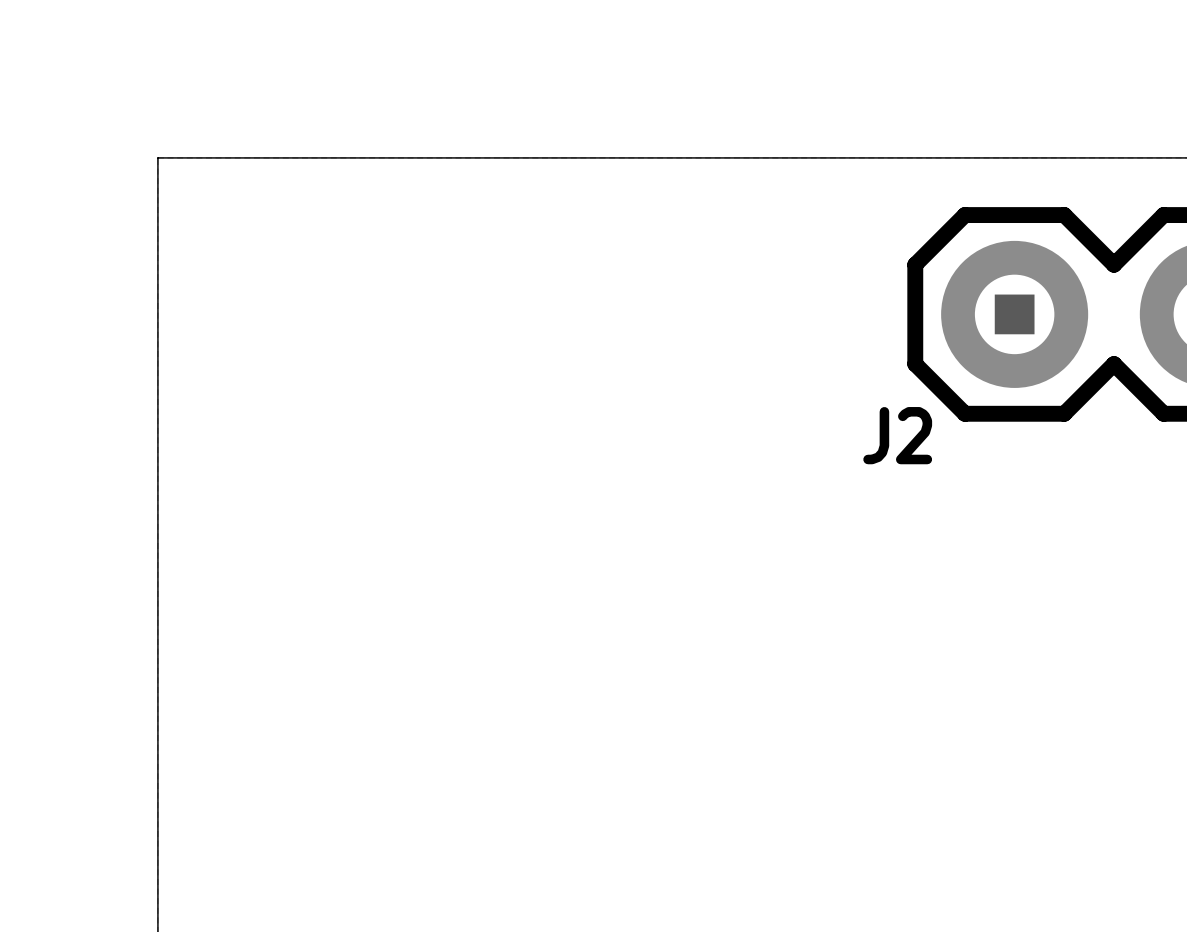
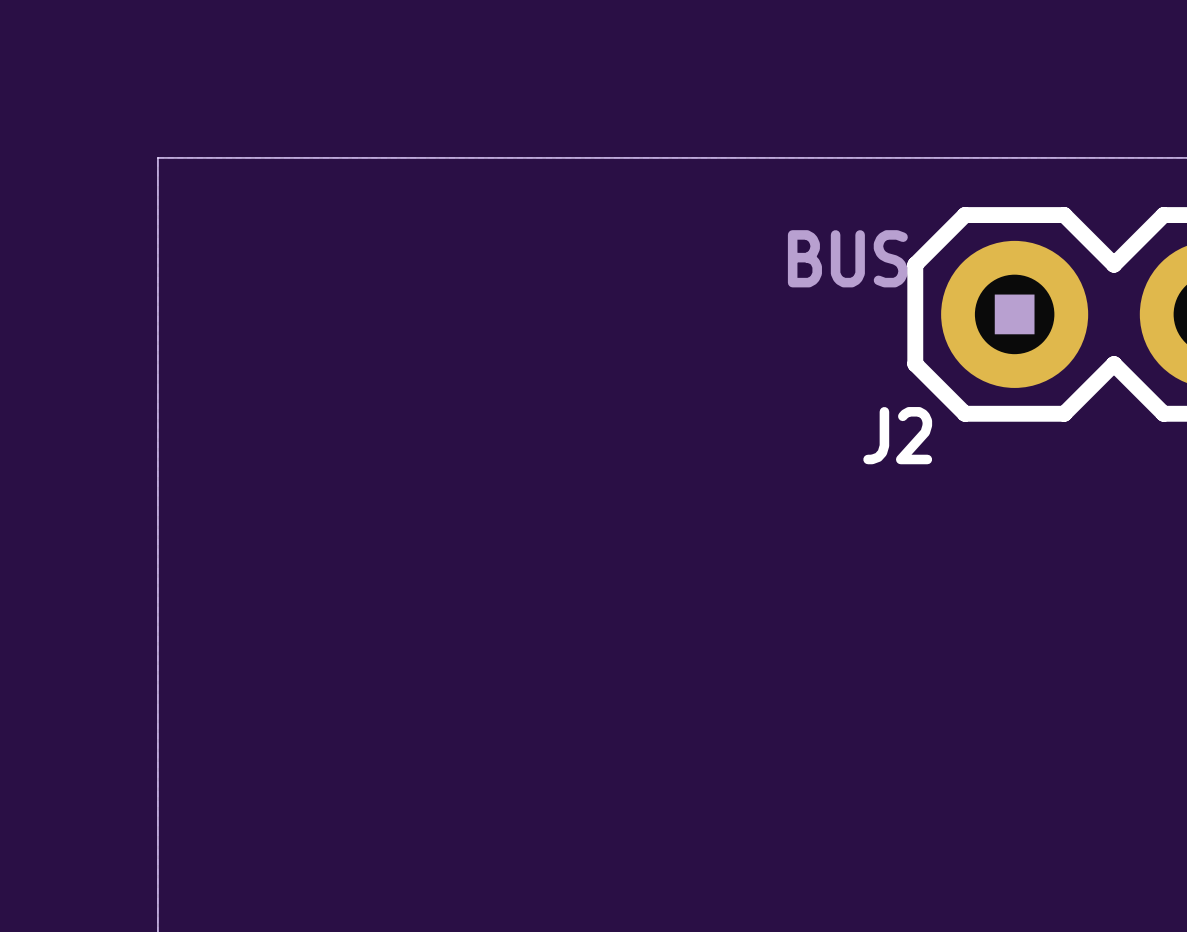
J2 value: none -> BUS (847, 258)

